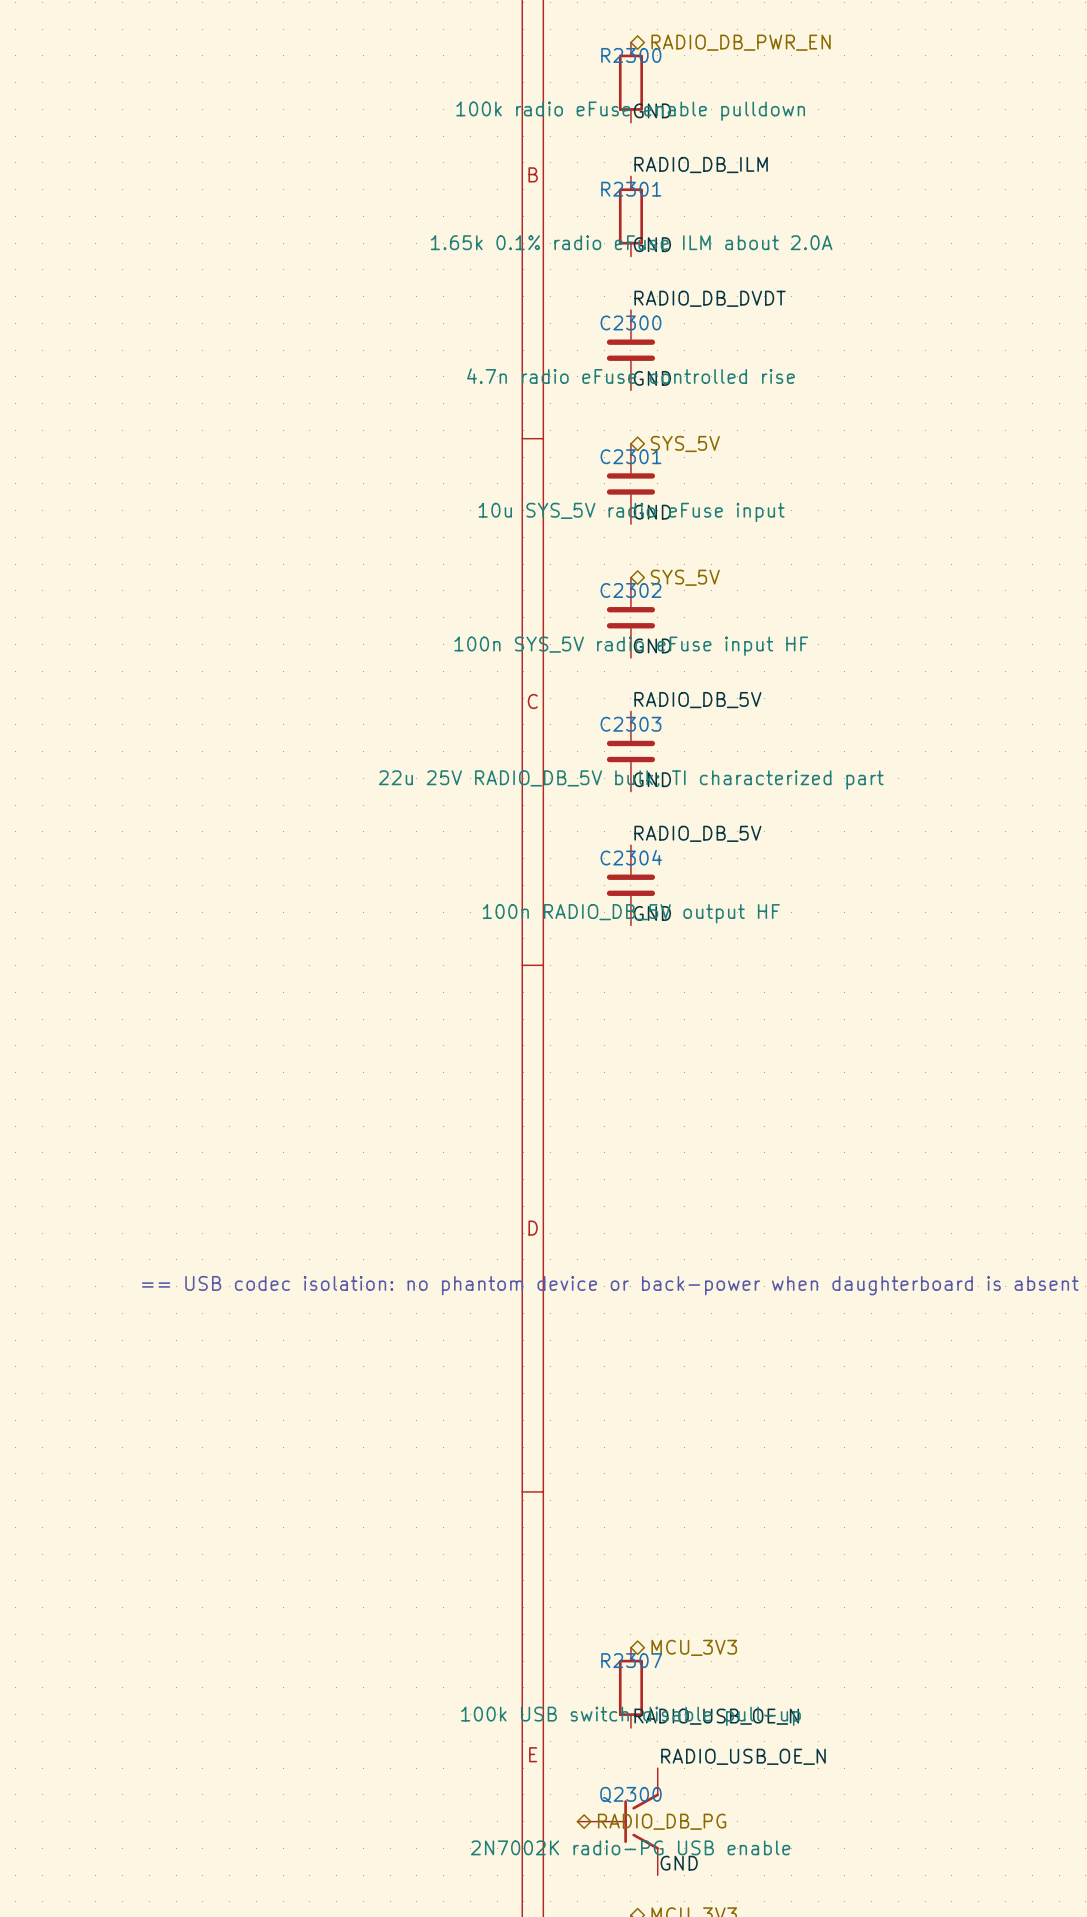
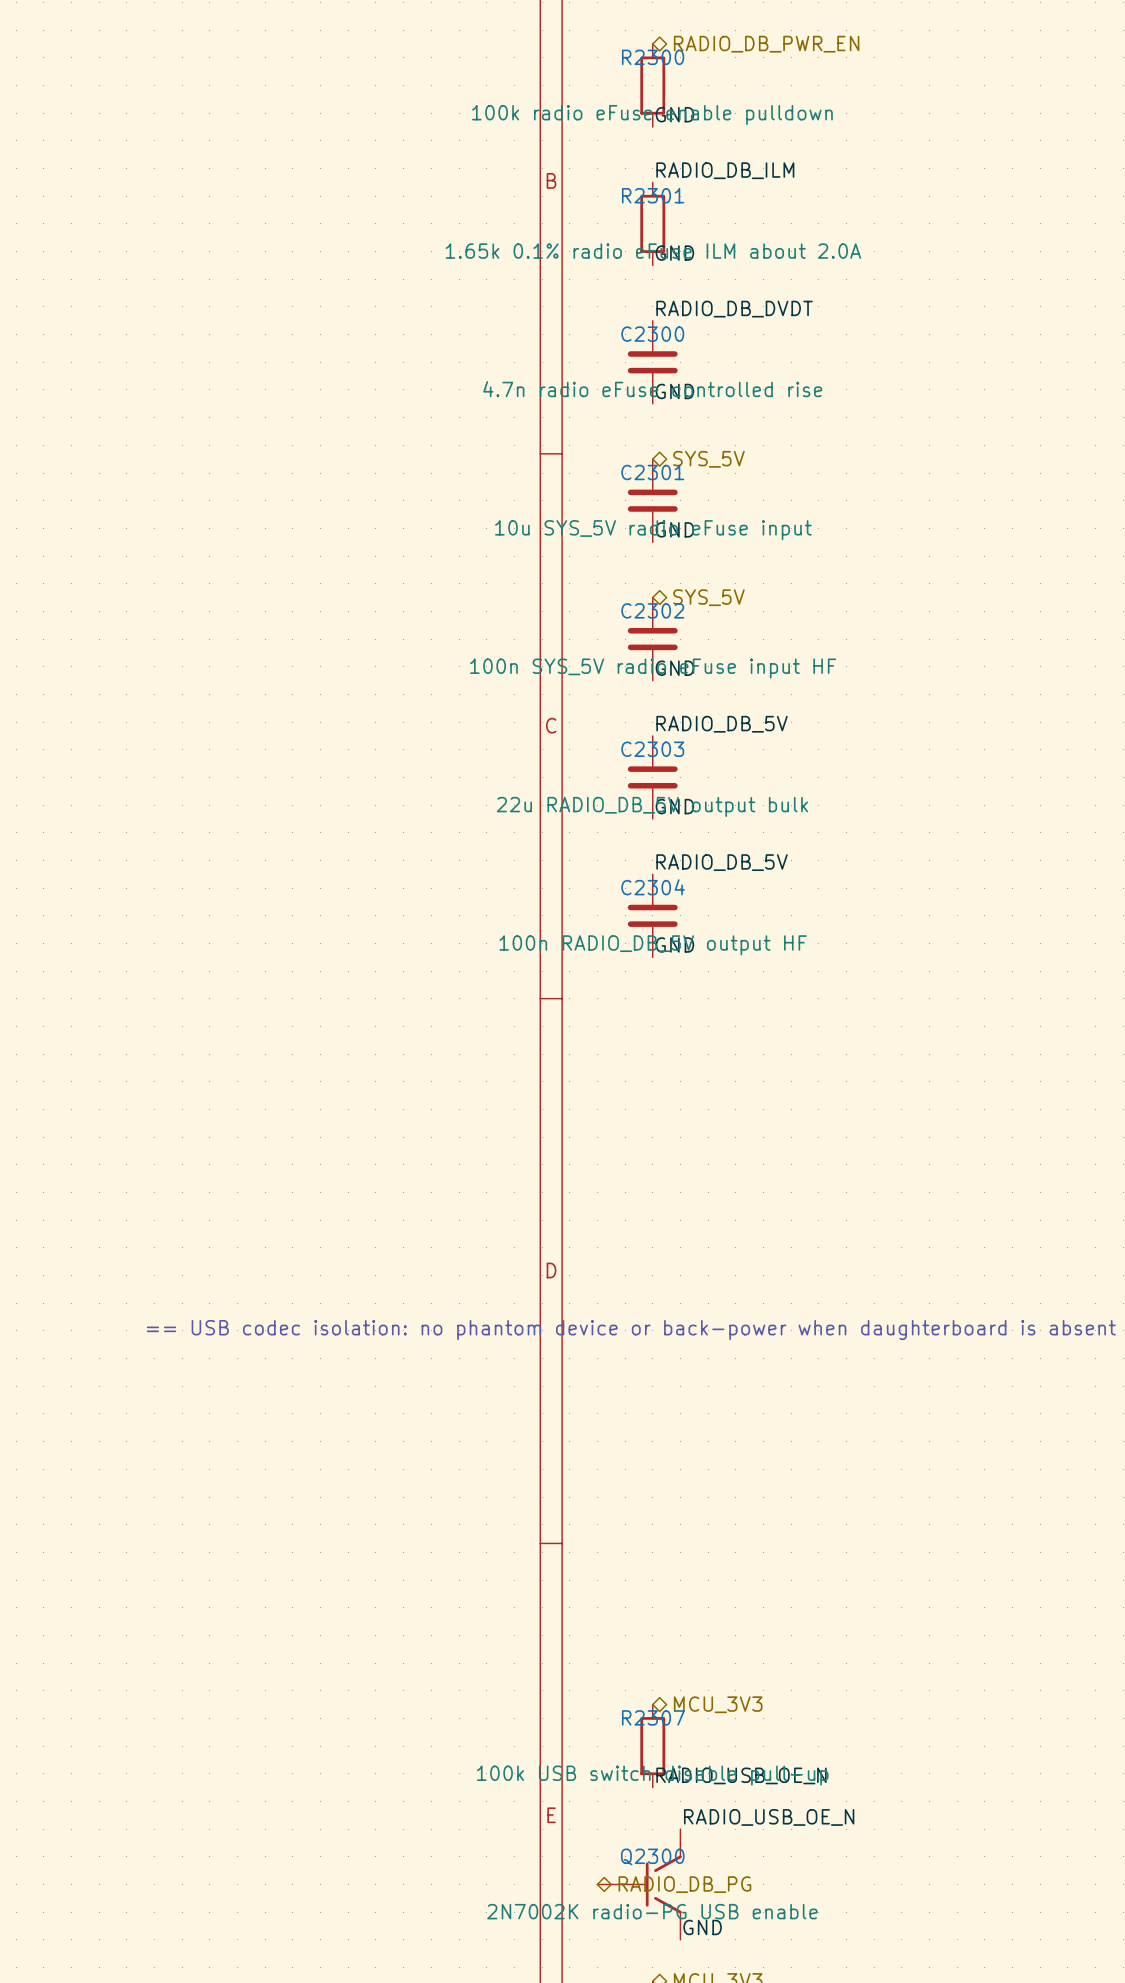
C2303 value: 22u 25V RADIO_DB_5V bulk; TI characterized part (631, 779) -> 22u RADIO_DB_5V output bulk (652, 806)

